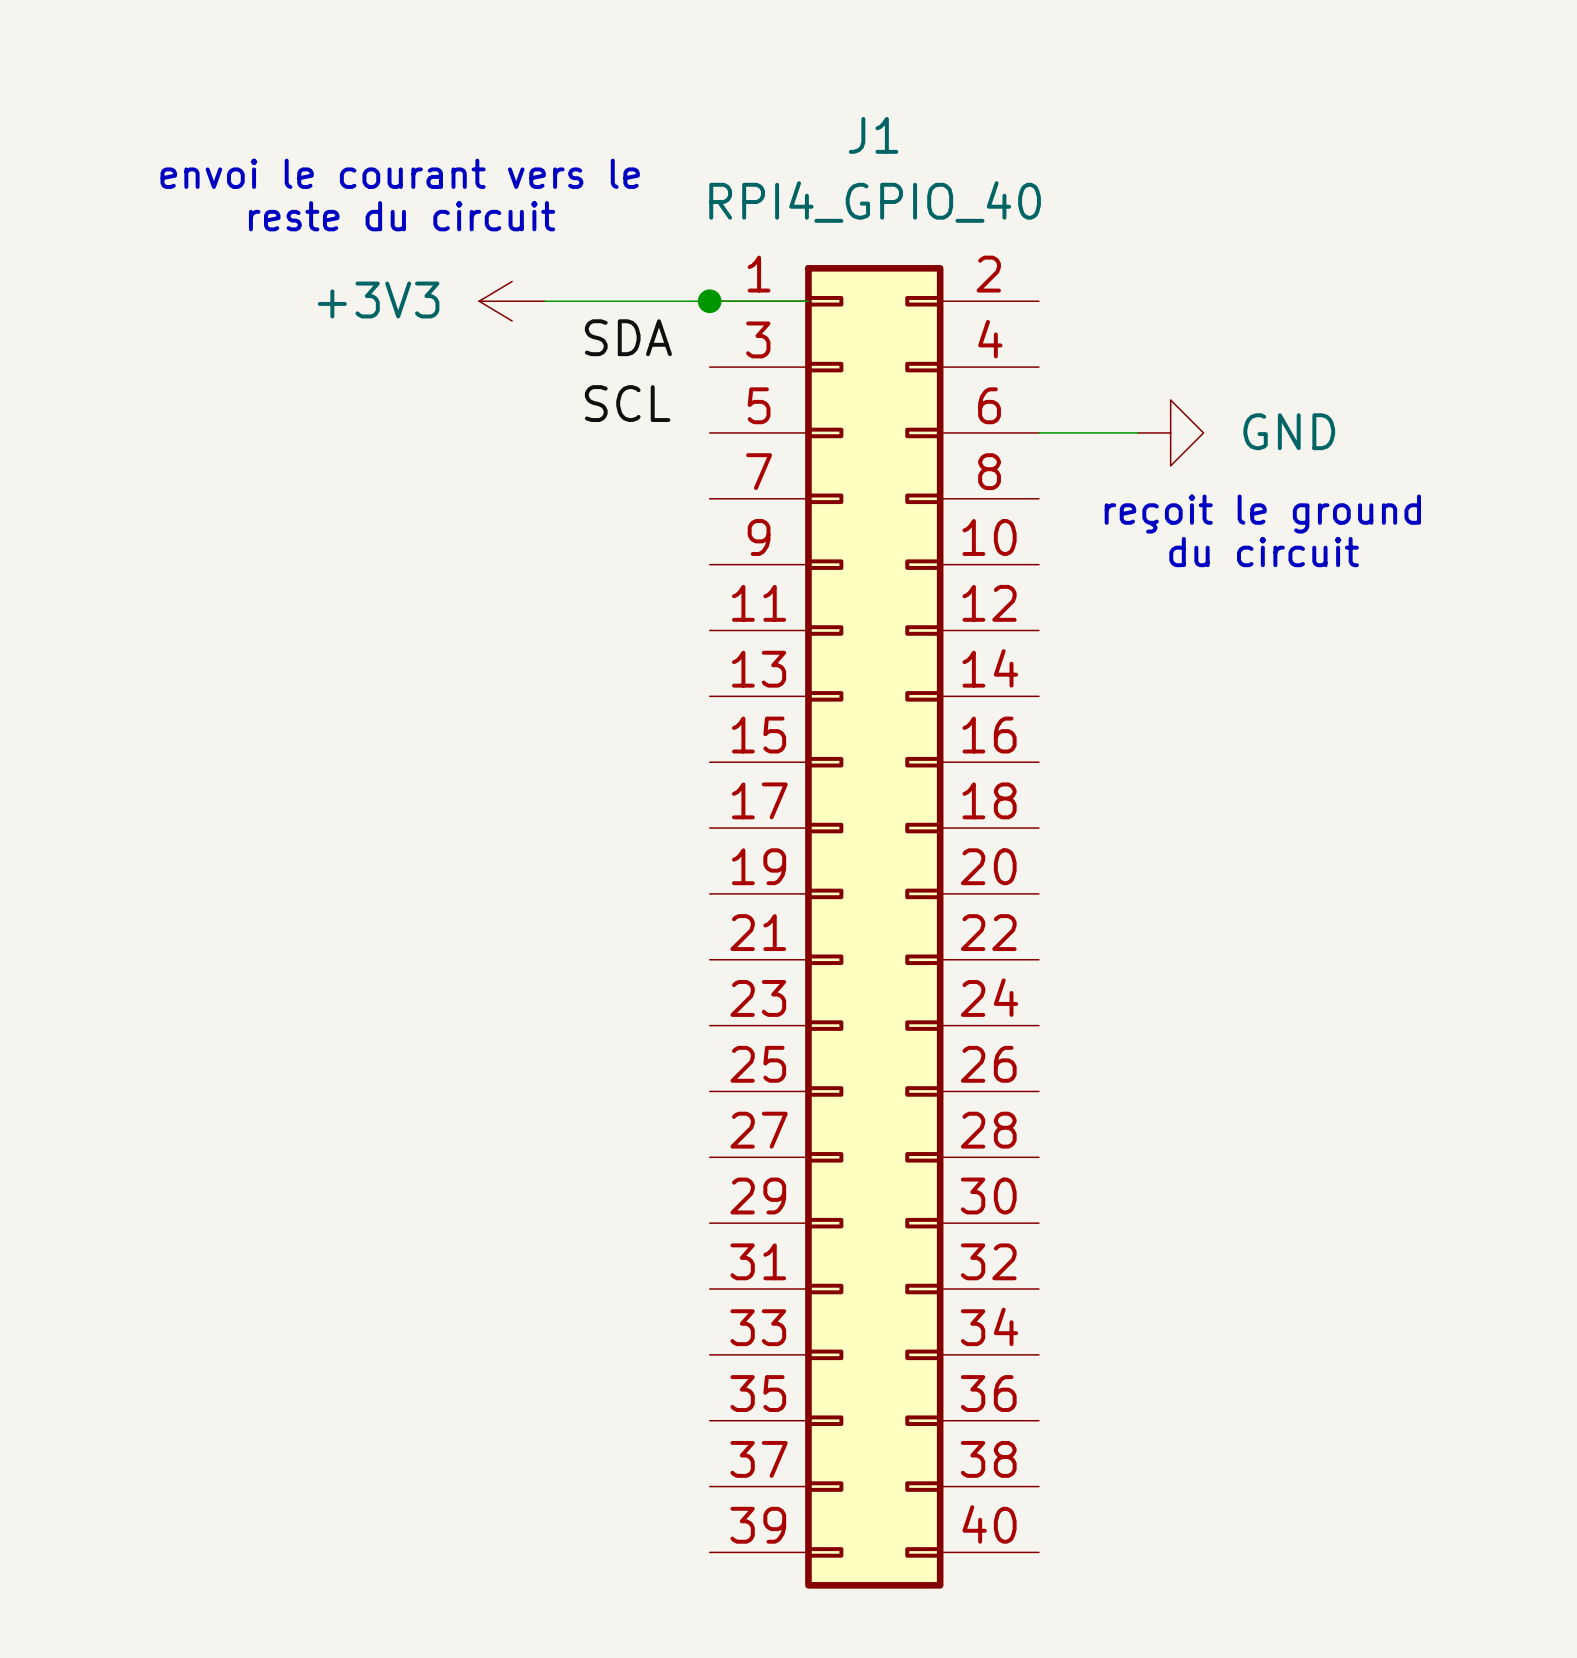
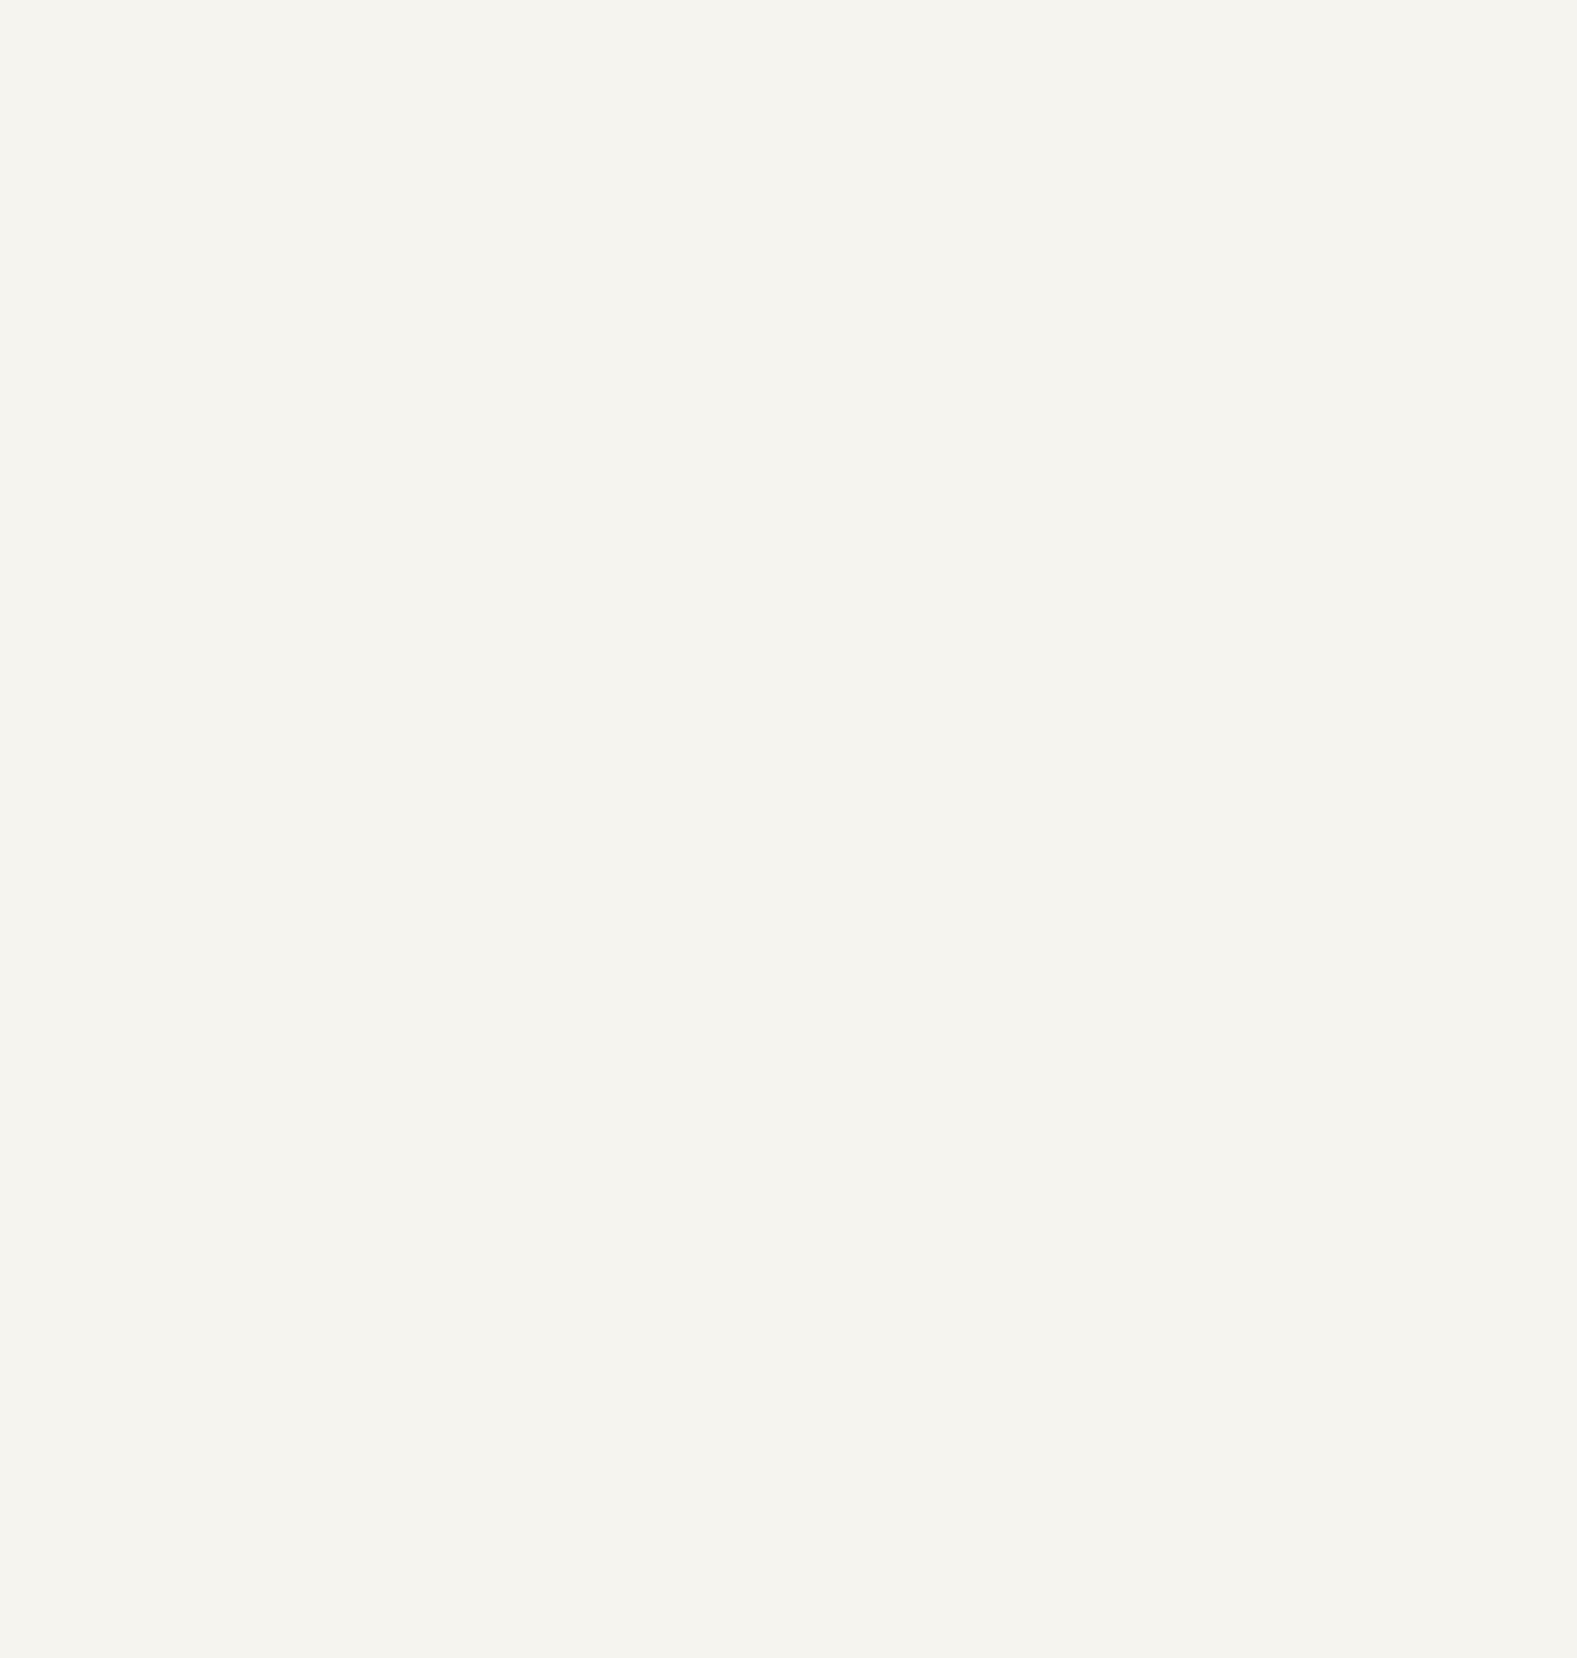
text: envoi le courant vers le (400, 173) -> none
text: reste du circuit (402, 216) -> none
power symbol: +3V3 (512, 301) -> none
wire: (545, 301) (808, 301) -> none
junction: (709, 301) -> none
label: SDA (628, 337) -> none
label: SCL (627, 403) -> none
wire: (1038, 432) (1137, 432) -> none
power symbol: GND (1170, 432) -> none
text: reçoit le ground (1262, 514) -> none
text: du circuit (1264, 552) -> none
J1: RPI4_GPIO_40 (874, 926) -> none

